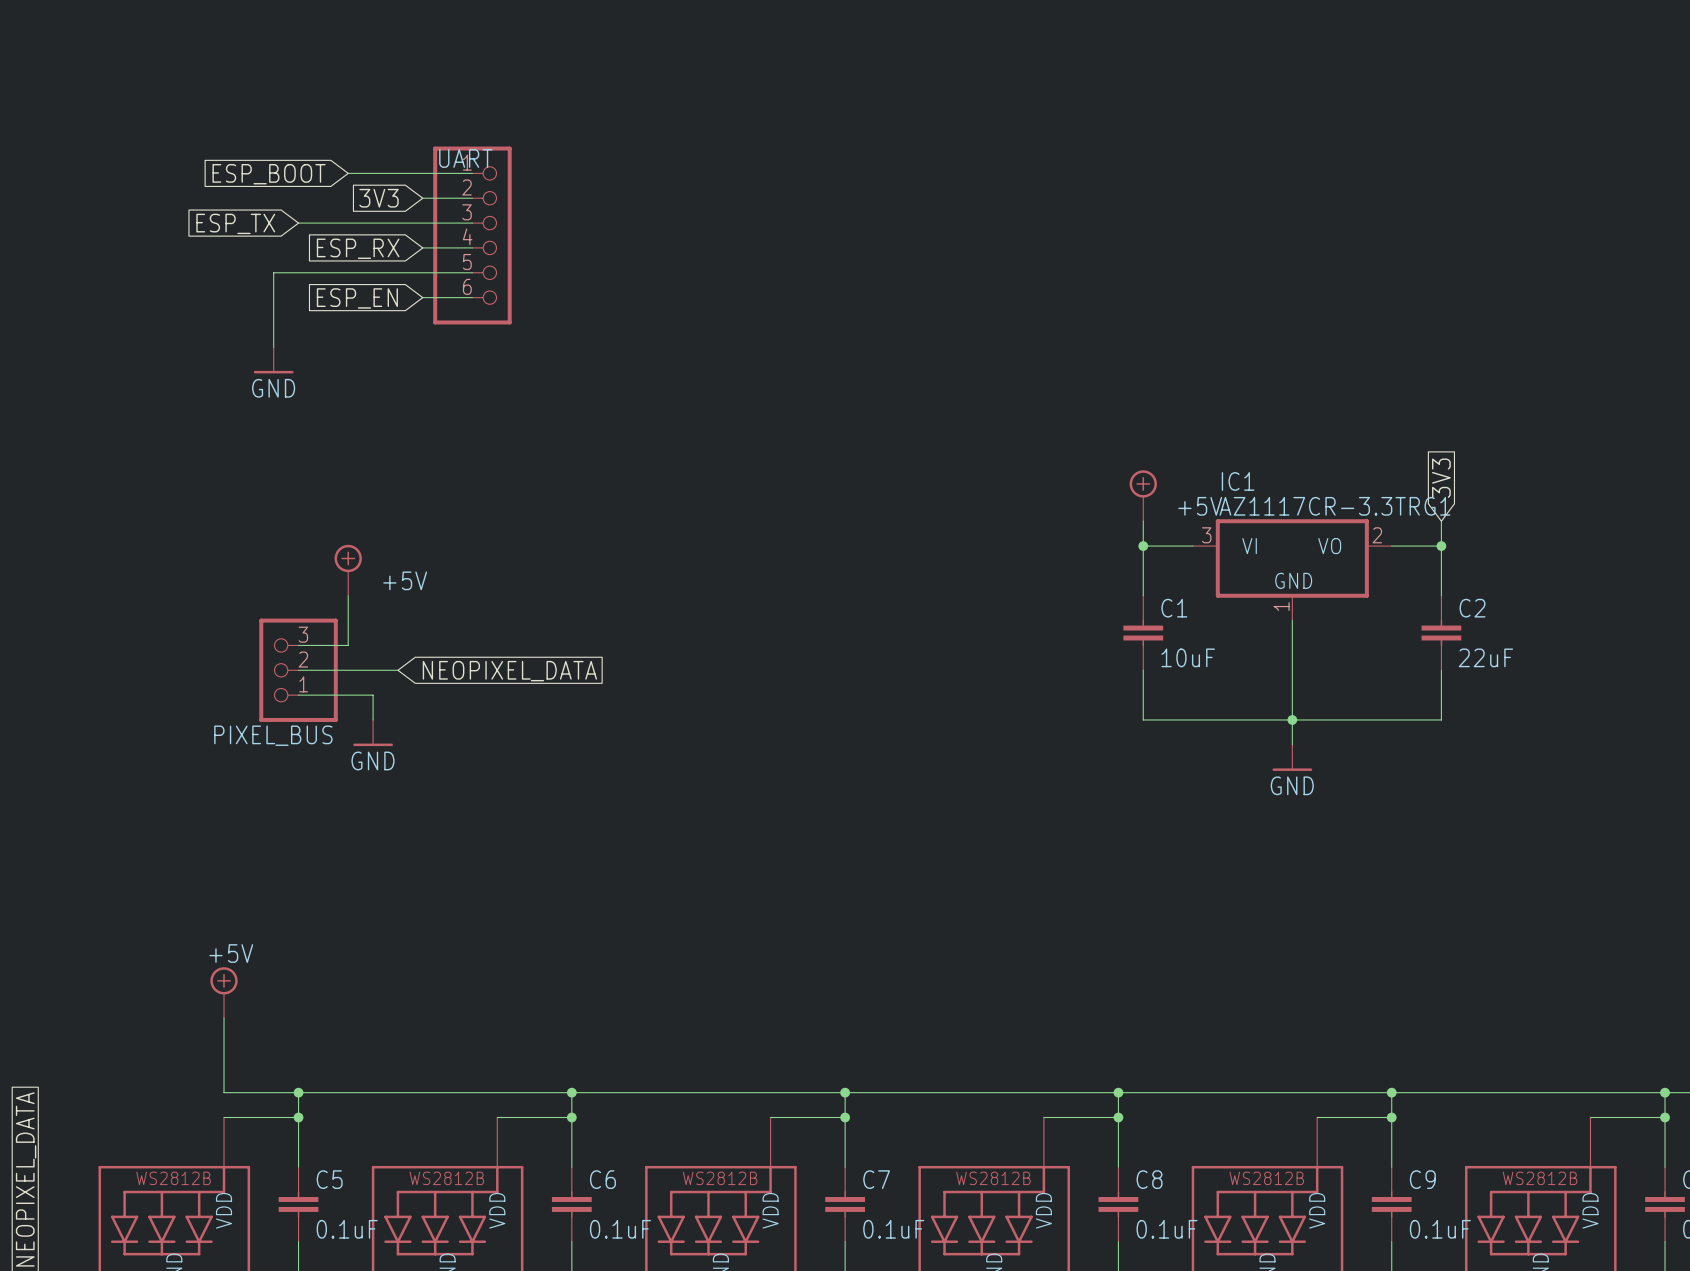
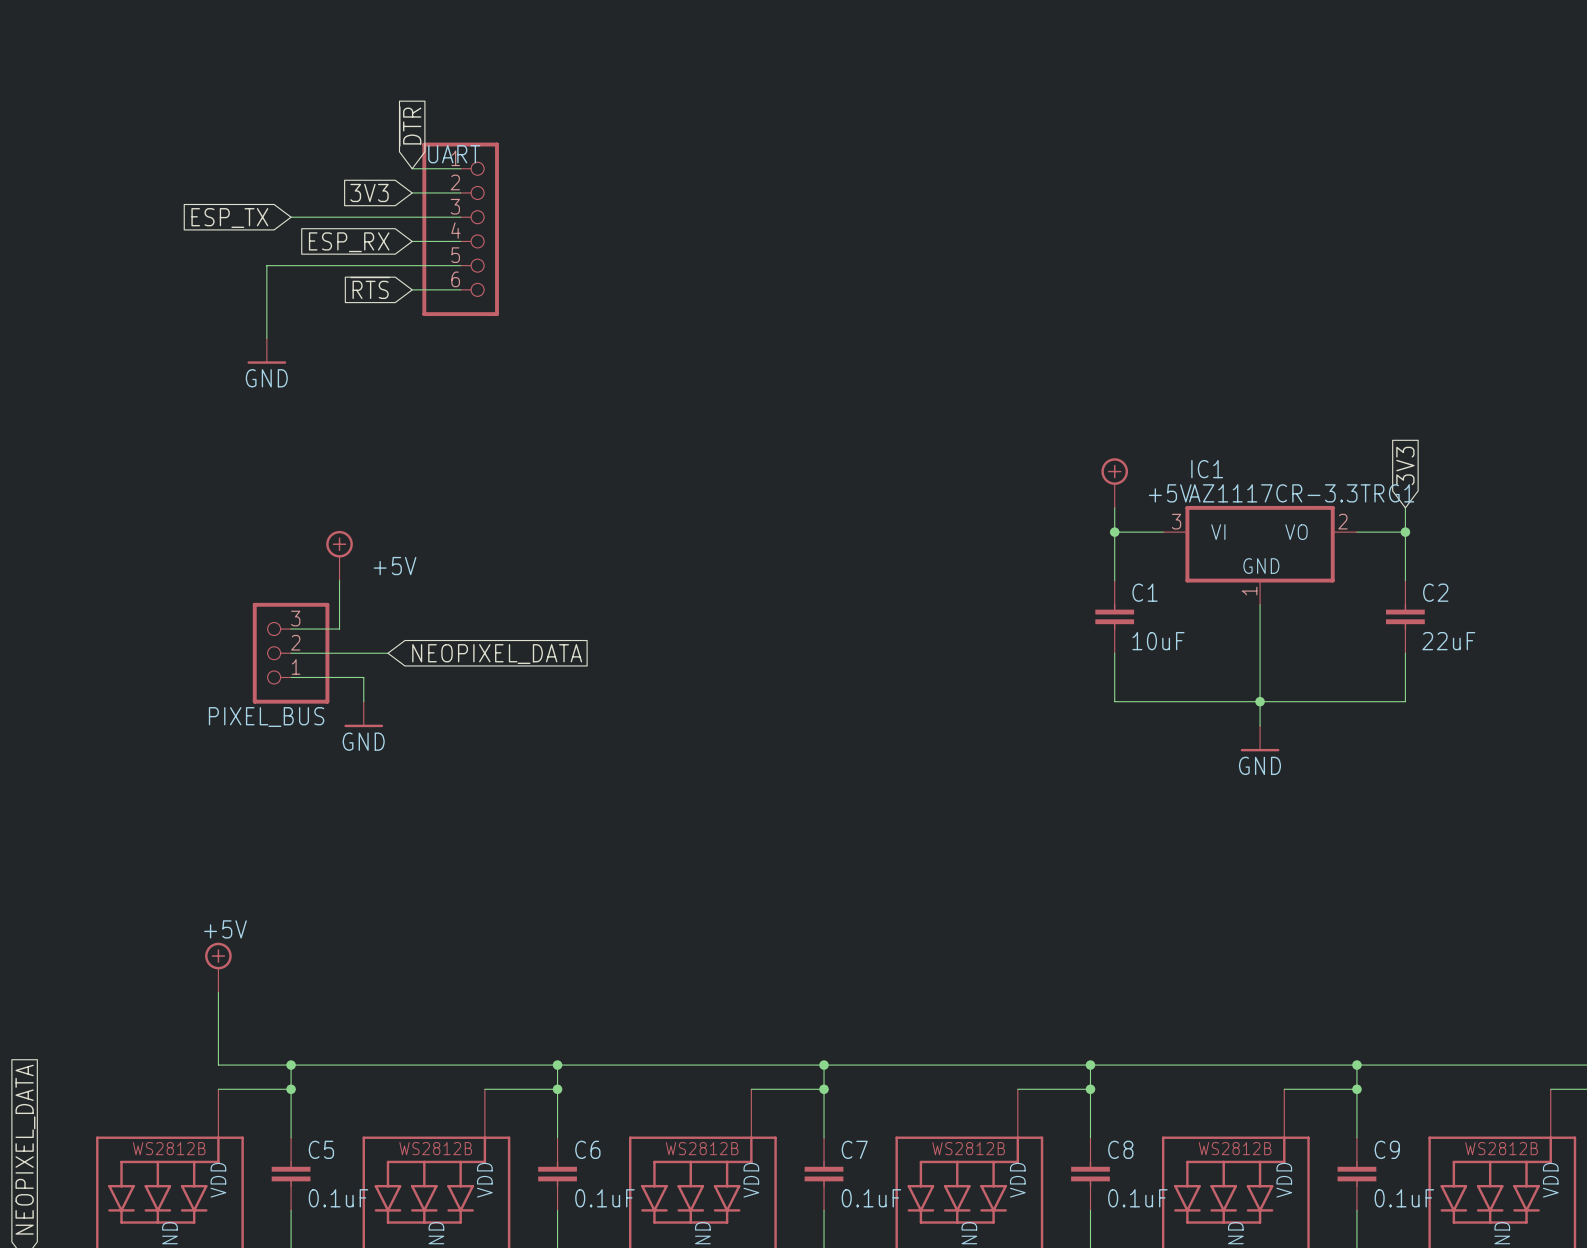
global label: none -> ~{DTR} (410, 126)
wire: (348, 173) (422, 173) -> none
global label: ESP_BOOT (269, 174) -> none
global label: ESP_EN (357, 298) -> ~{RTS} (370, 287)

